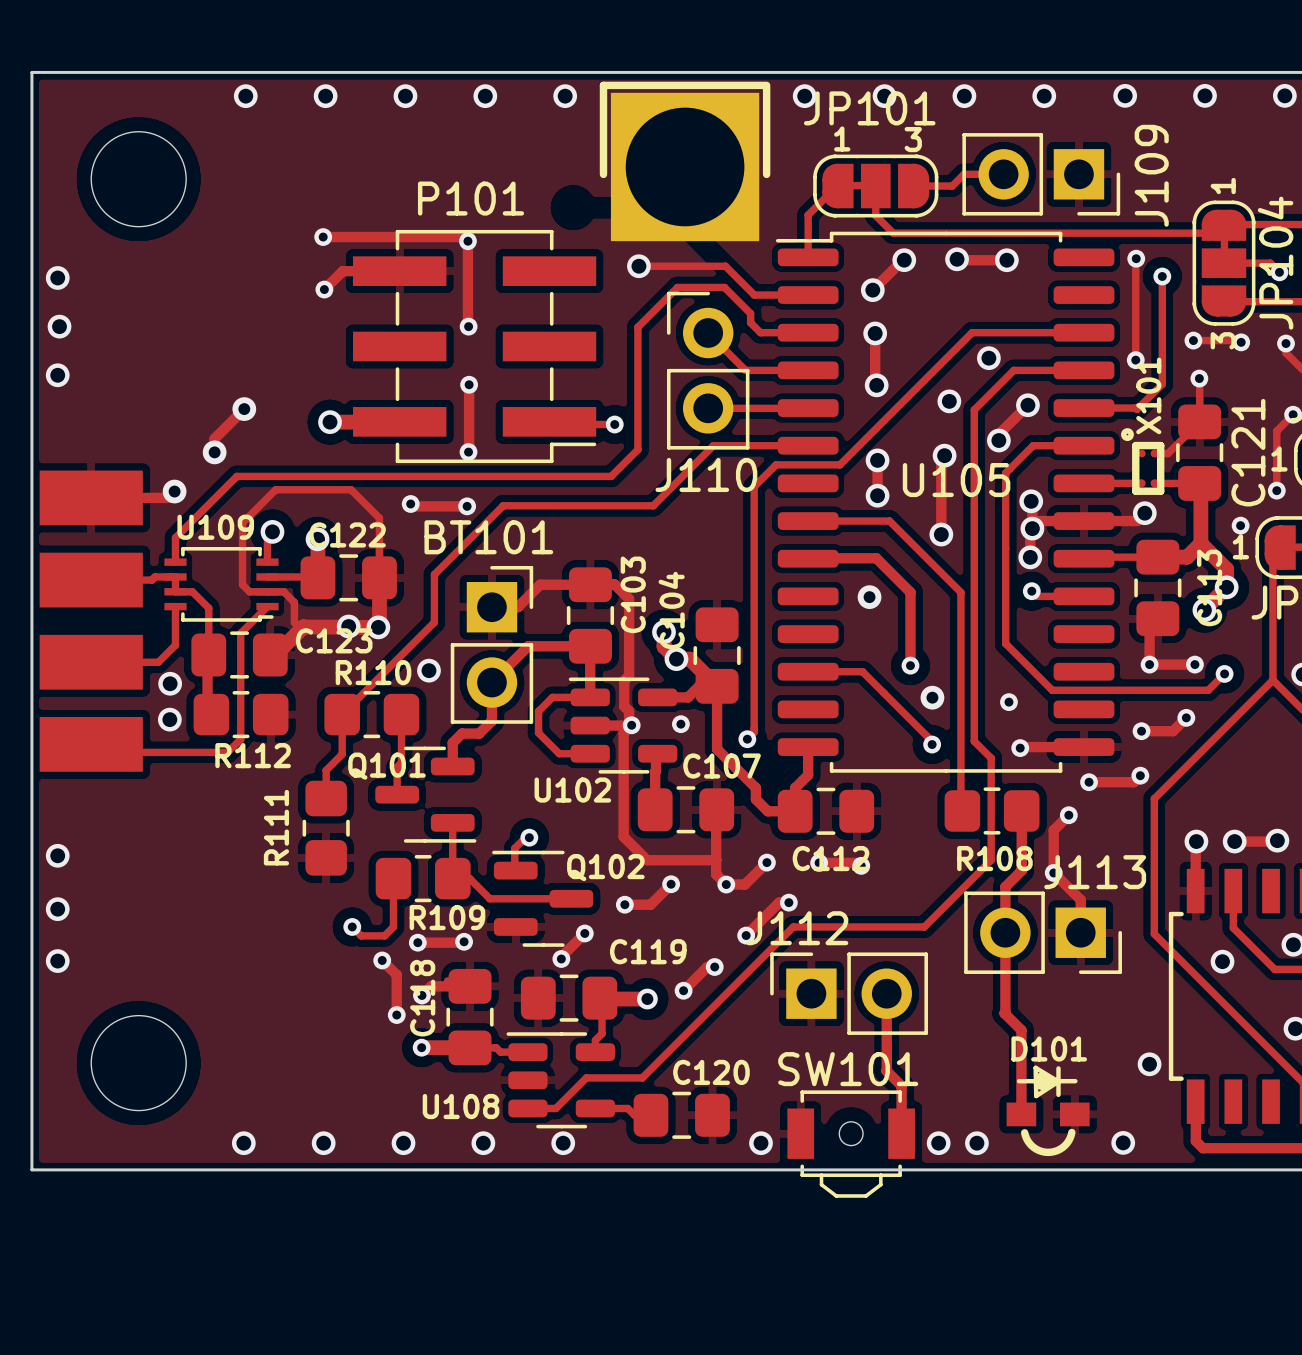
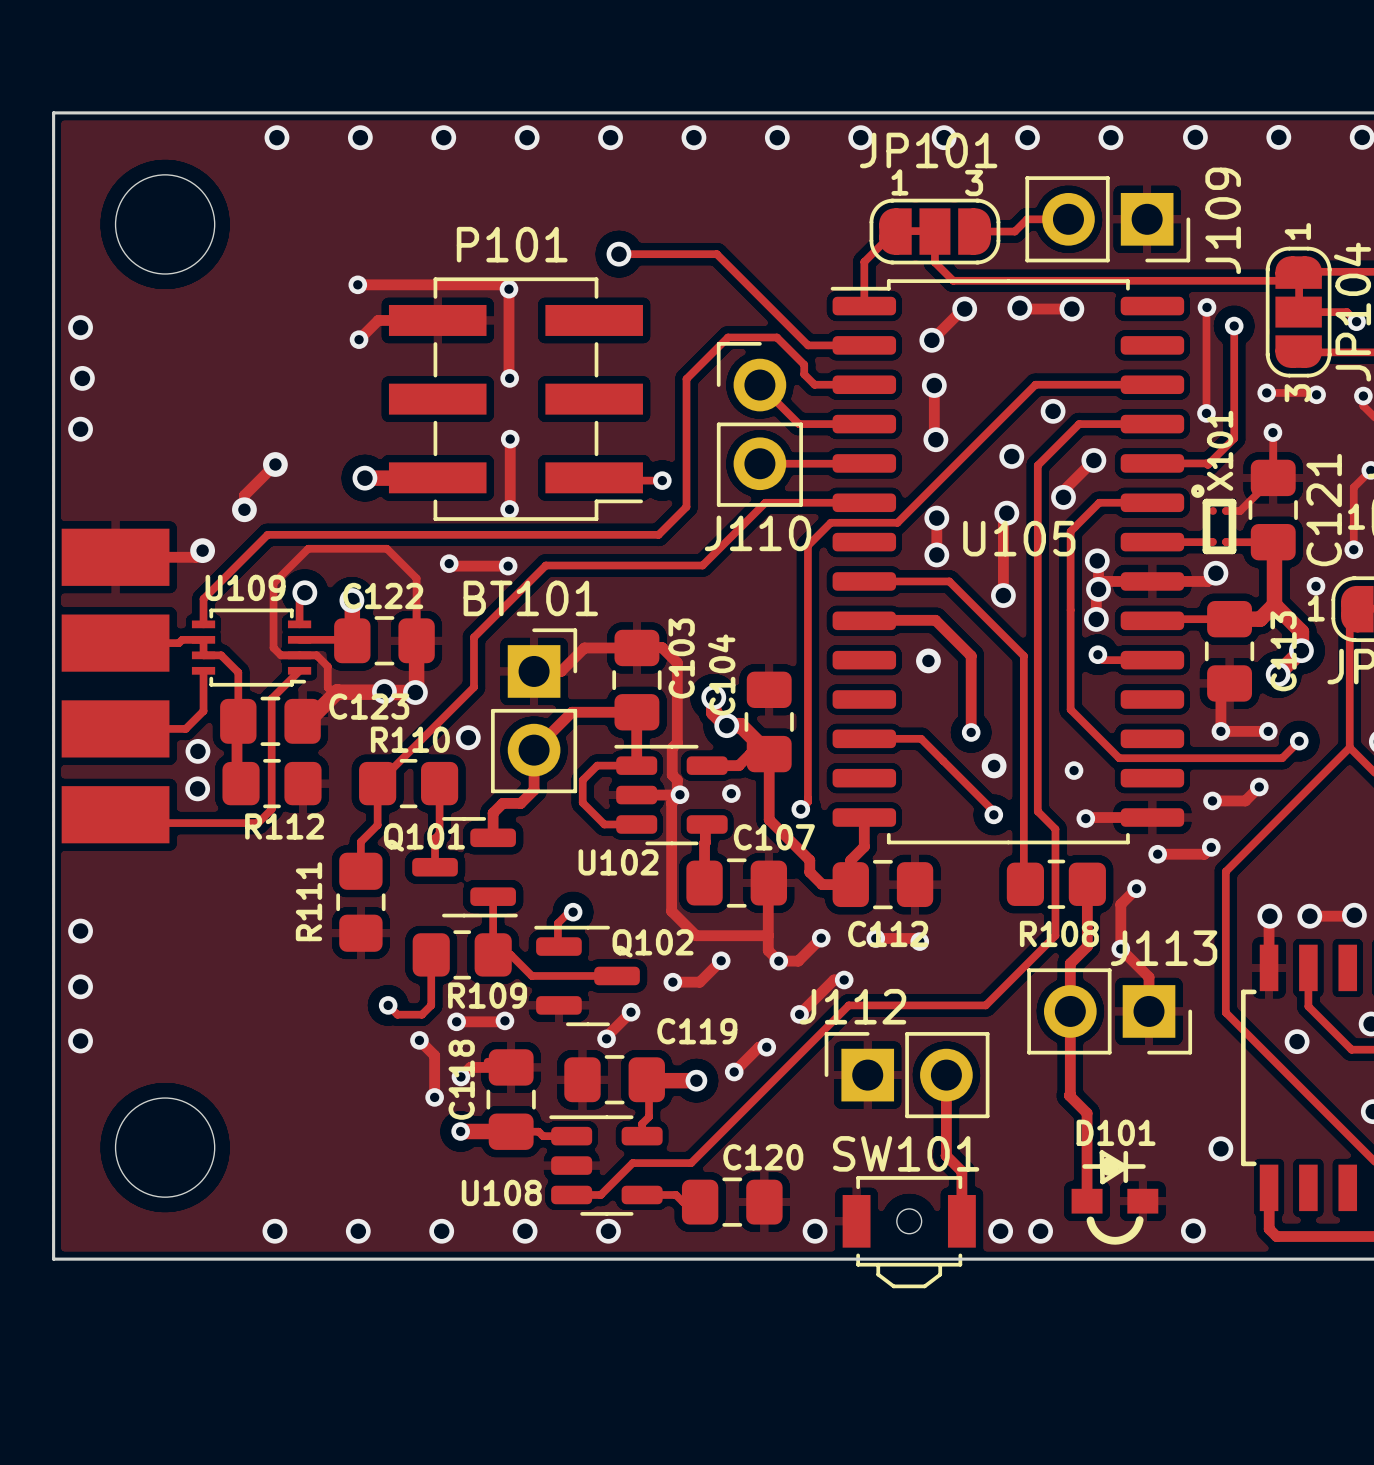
via: none -> (693, 137)
via: none -> (777, 137)
part: (685, 161) -> none
via: none -> (618, 254)
track: (638, 266) (725, 266) -> (618, 254) (716, 254) (778, 315)
via: (638, 266) -> none

